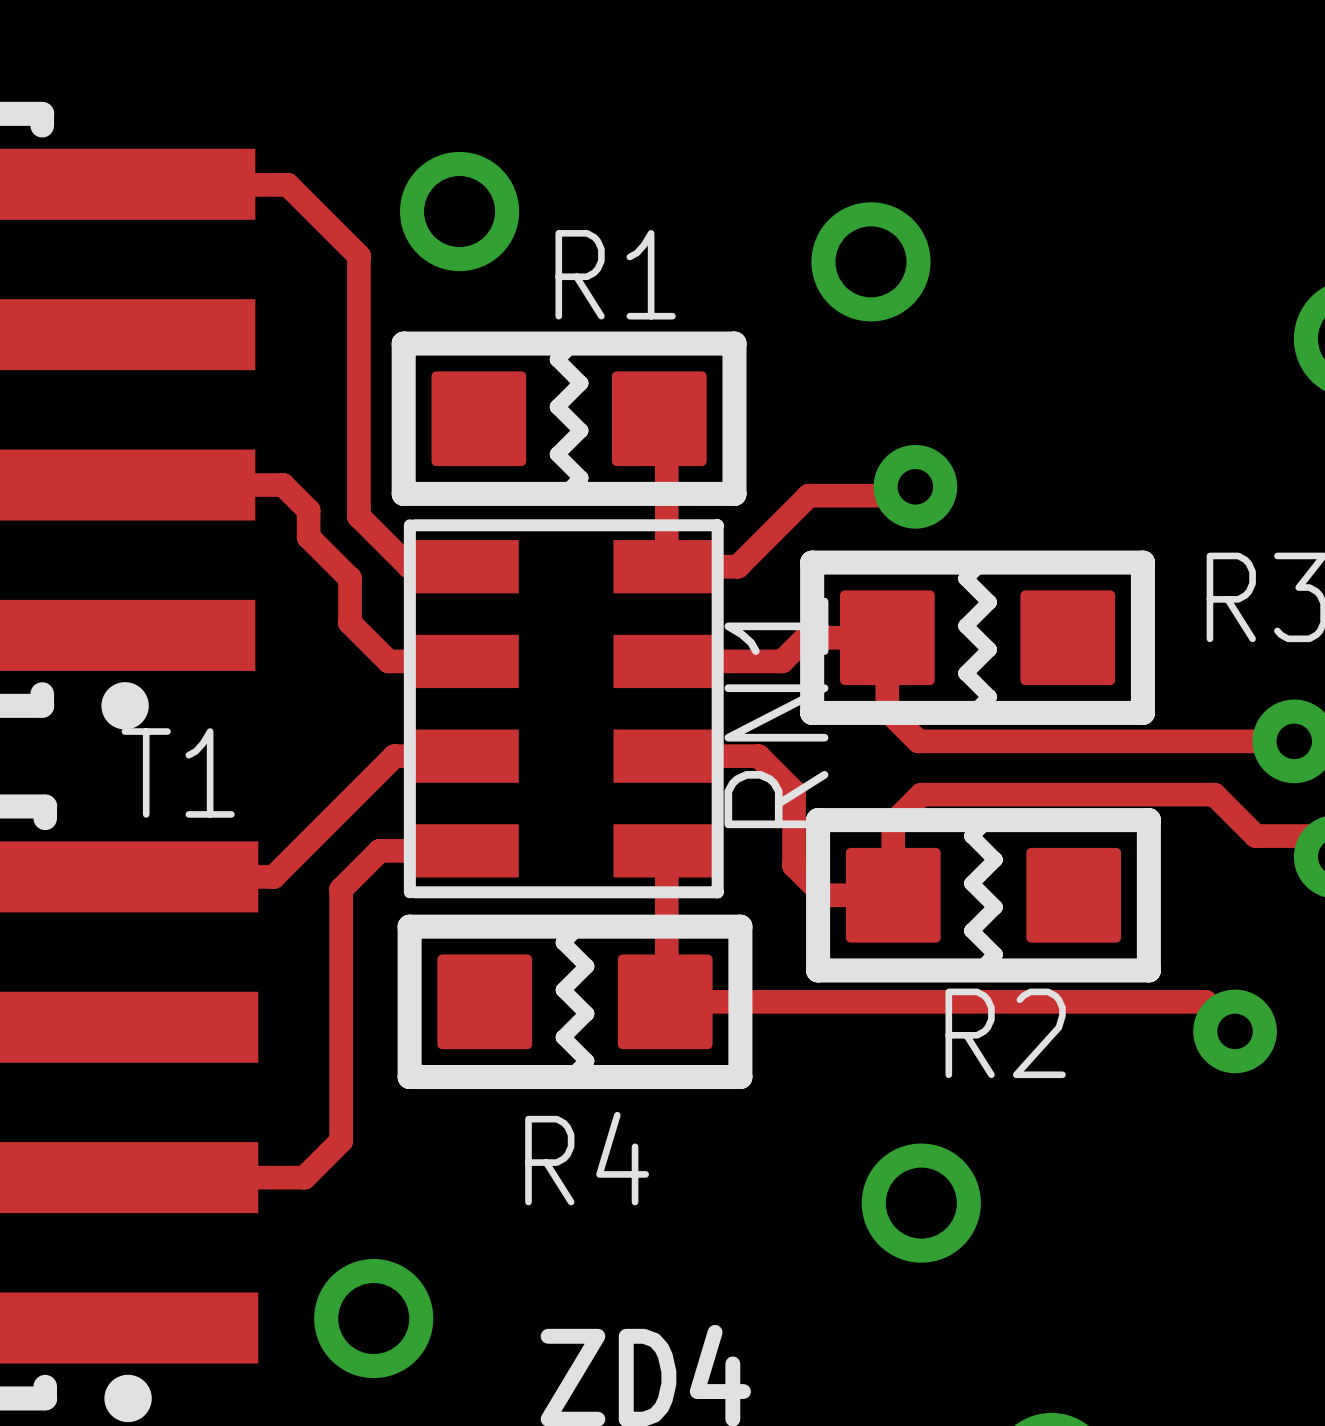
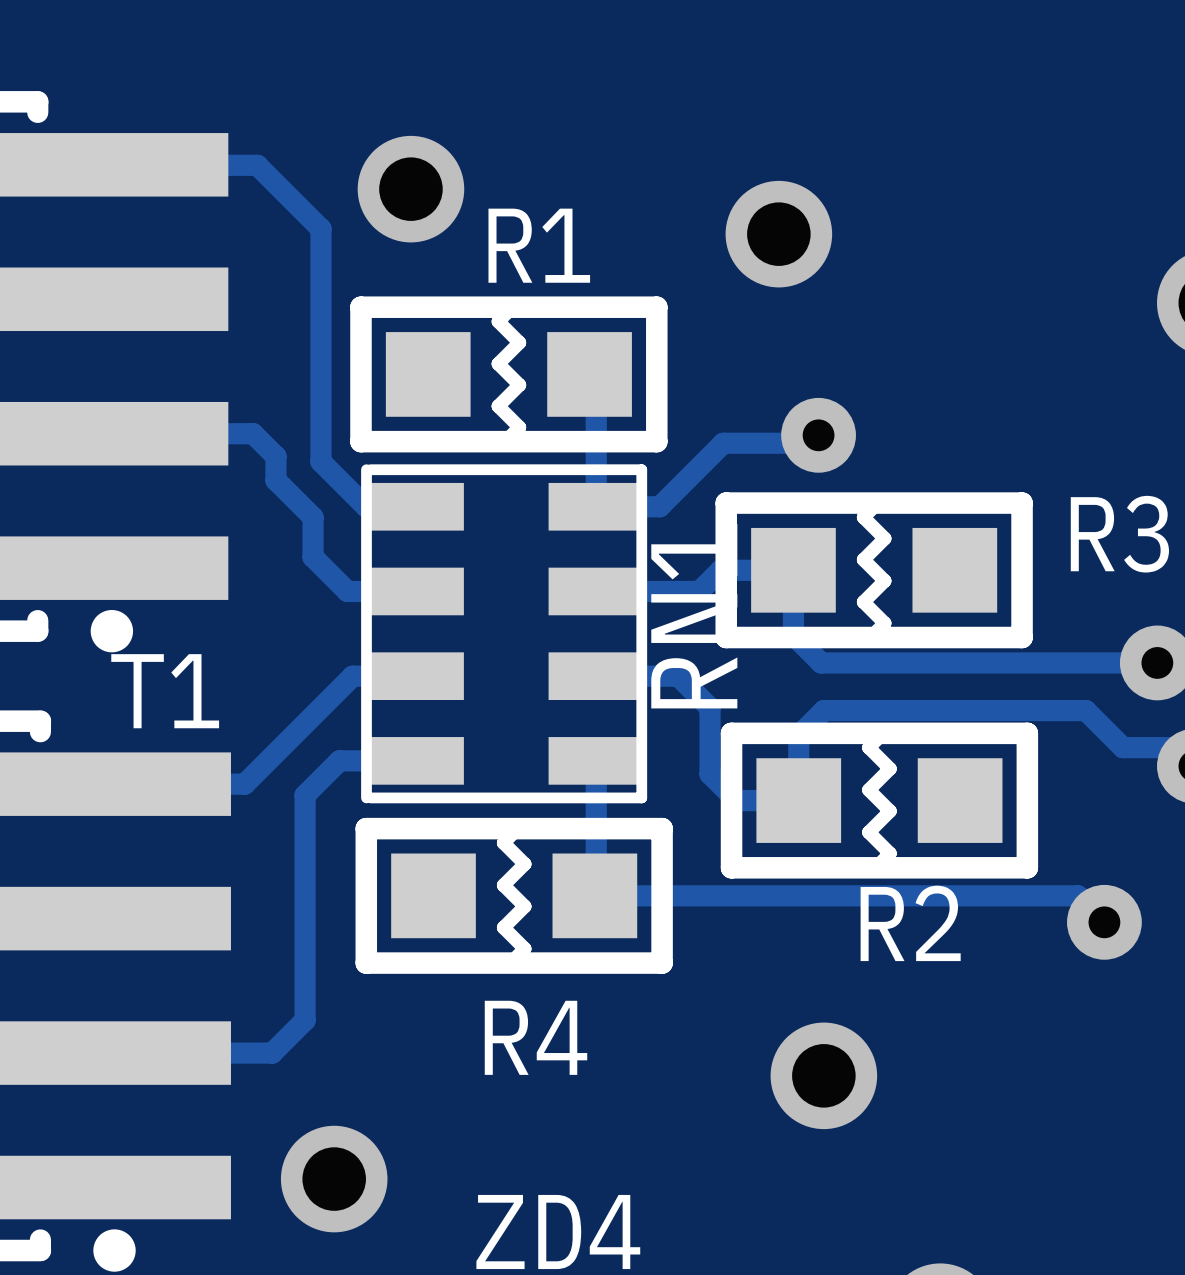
R1 footprint: [391, 331, 747, 506] -> [350, 296, 668, 453]
R3 footprint: [800, 550, 1155, 725] -> [715, 492, 1033, 649]
R2 footprint: [806, 808, 1161, 983] -> [720, 722, 1039, 879]
R4 footprint: [397, 914, 753, 1090] -> [355, 817, 673, 974]

